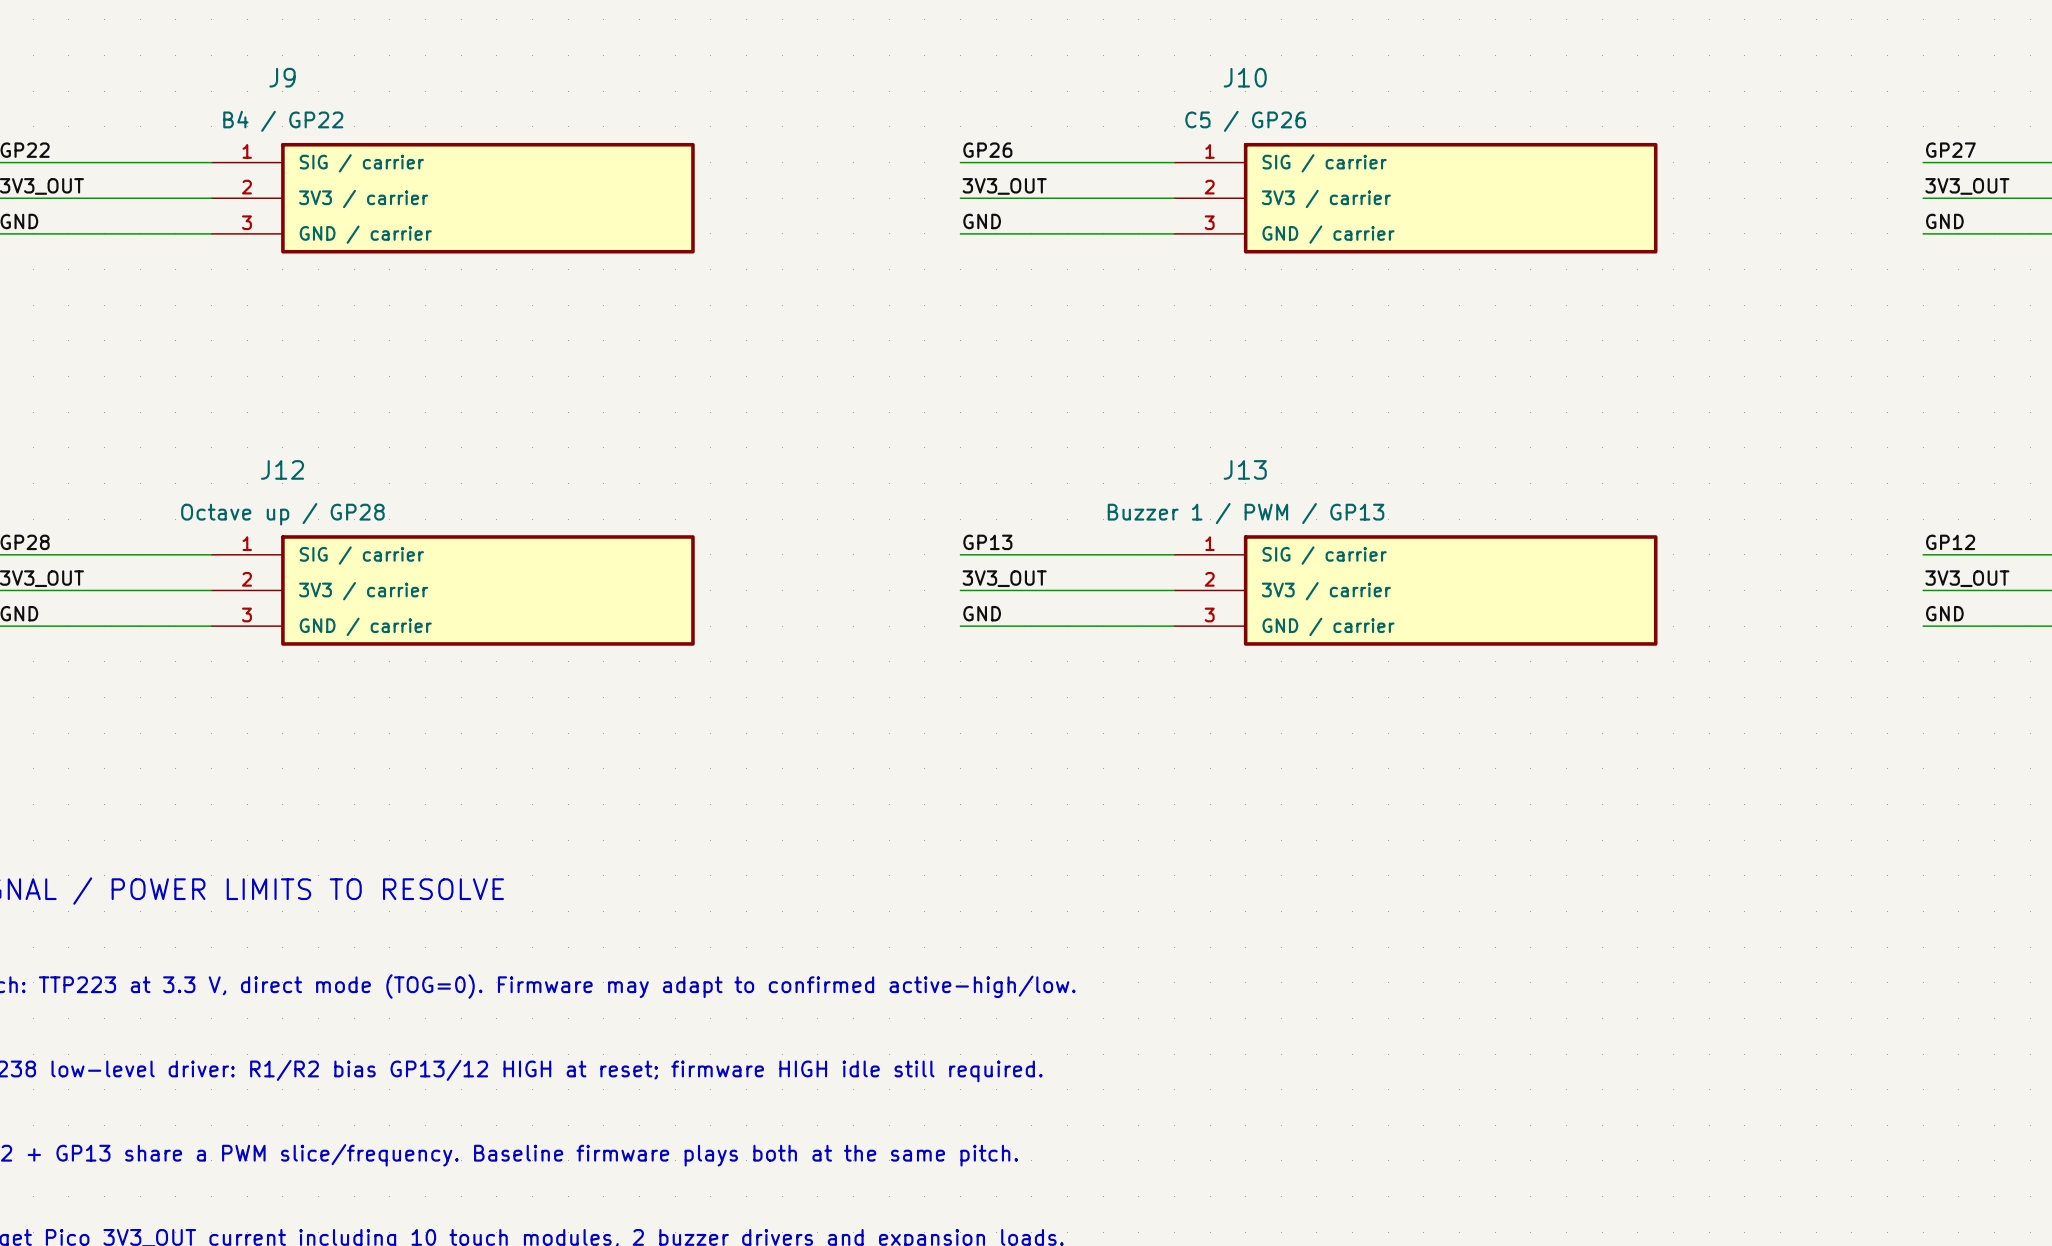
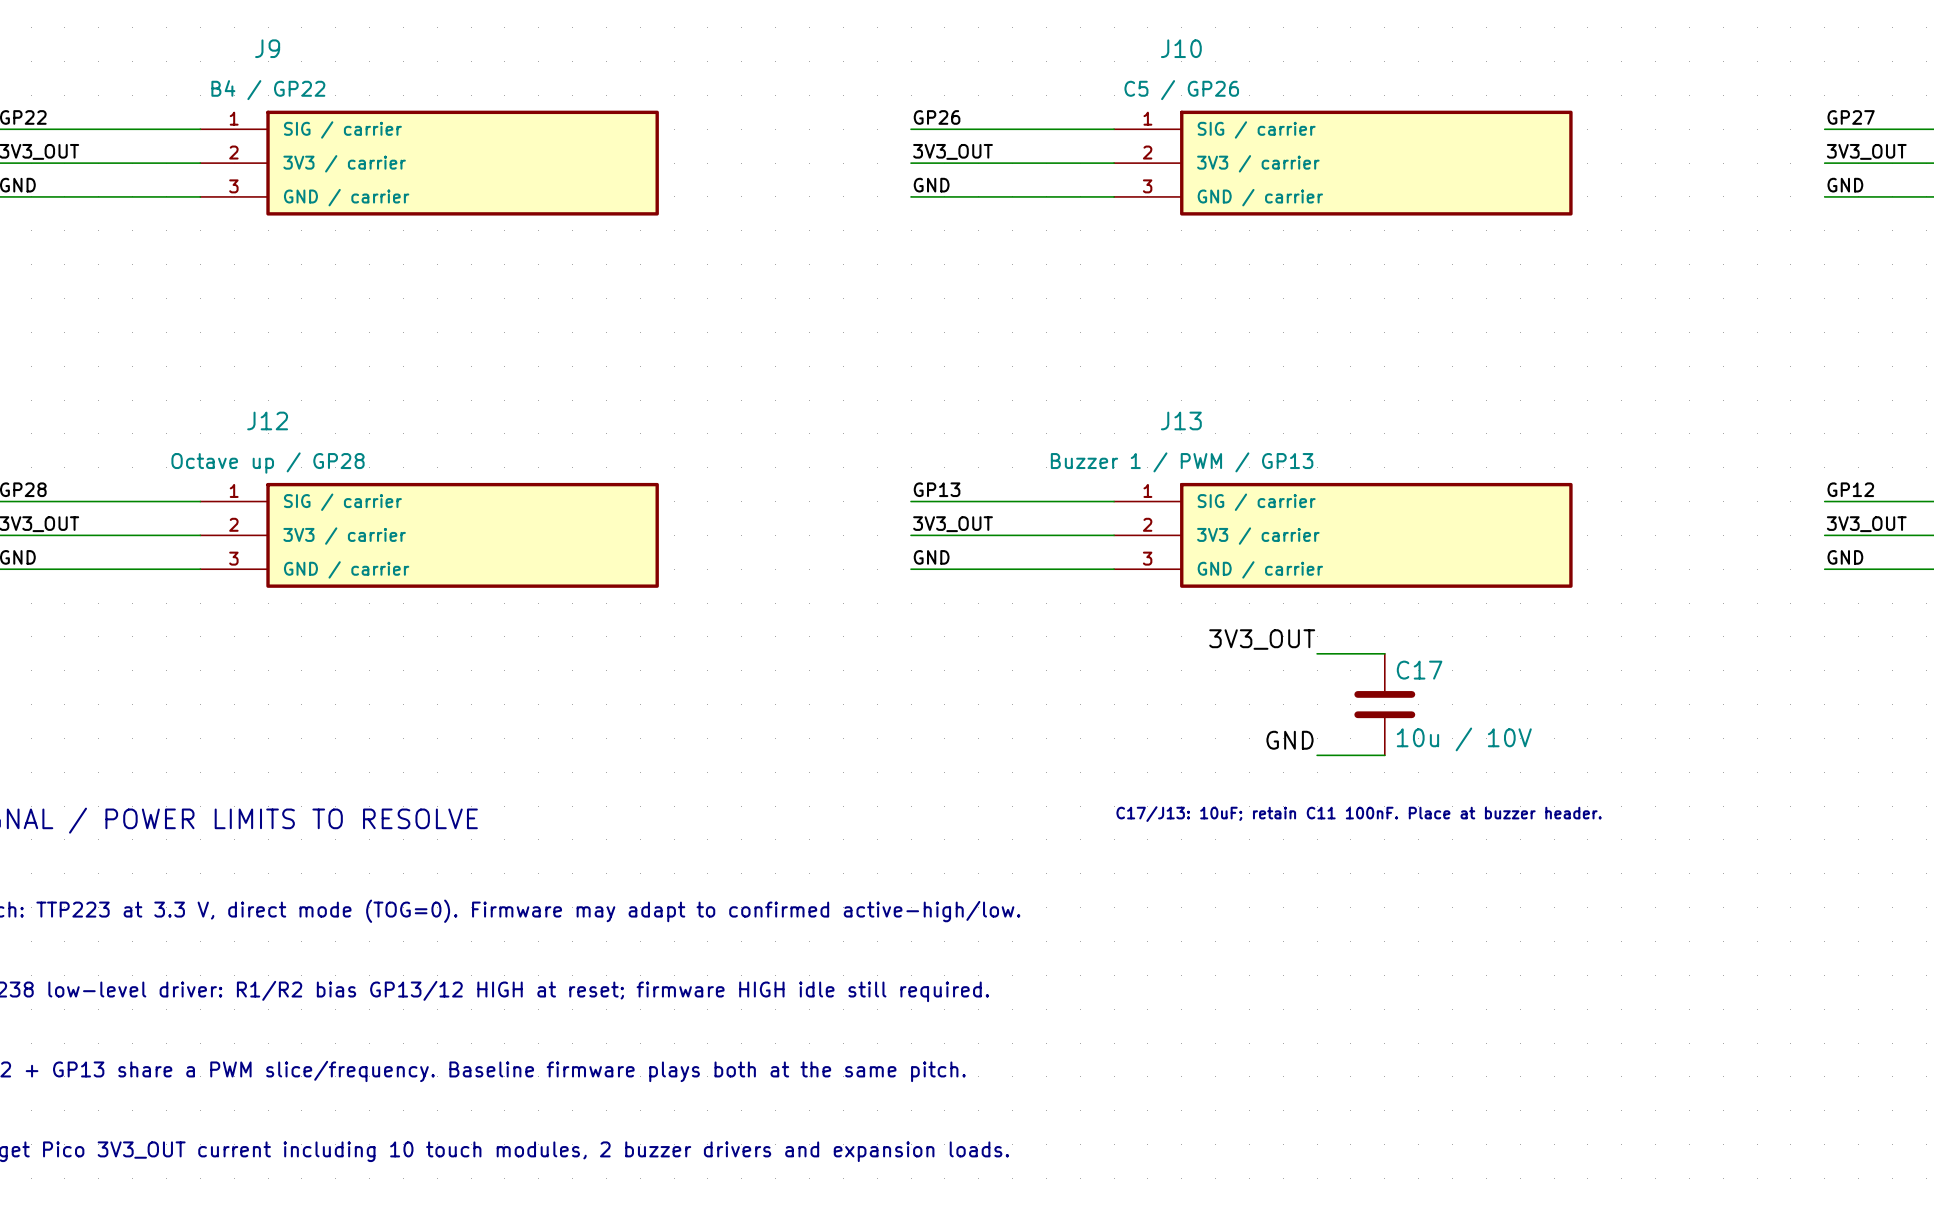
label: none -> 3V3_OUT (1262, 639)
wire: none -> (1317, 653) (1384, 653)
C17: none -> 10u / 10V (1384, 704)
label: none -> GND (1290, 740)
wire: none -> (1317, 755) (1384, 755)
text: none -> C17/J13: 10uF; retain C11 100nF. Place at buzzer header. (1359, 814)

